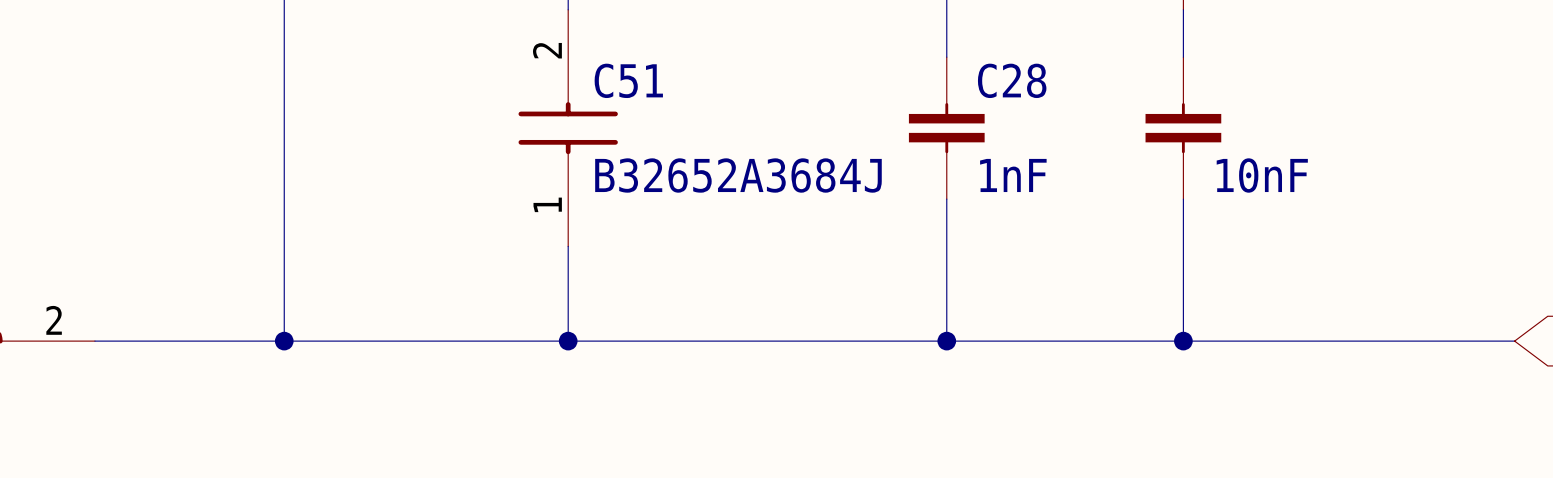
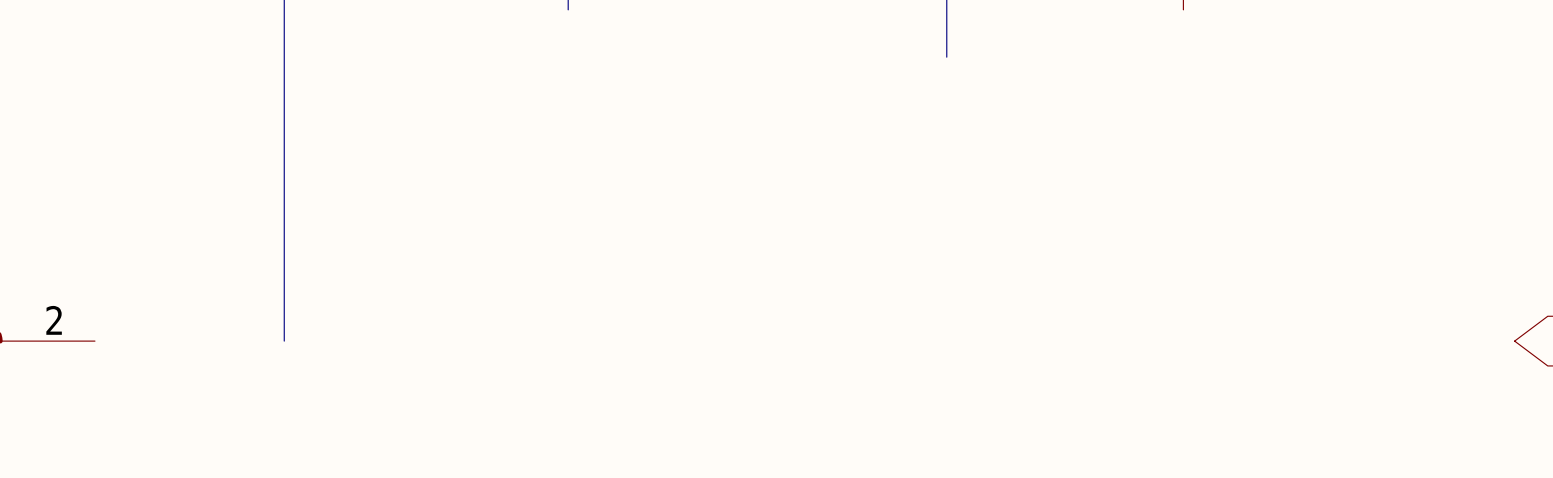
wire: (1183, 9) (1183, 57) -> none
C51: B32652A3684J (568, 128) -> none
C28: 1nF (946, 128) -> none
part: 10nF (1183, 128) -> none
wire: (946, 199) (946, 341) -> none
wire: (1183, 199) (1183, 341) -> none
wire: (568, 246) (568, 341) -> none
wire: (94, 341) (1514, 341) -> none
junction: (284, 341) -> none
junction: (568, 341) -> none
junction: (946, 341) -> none
junction: (1183, 341) -> none

